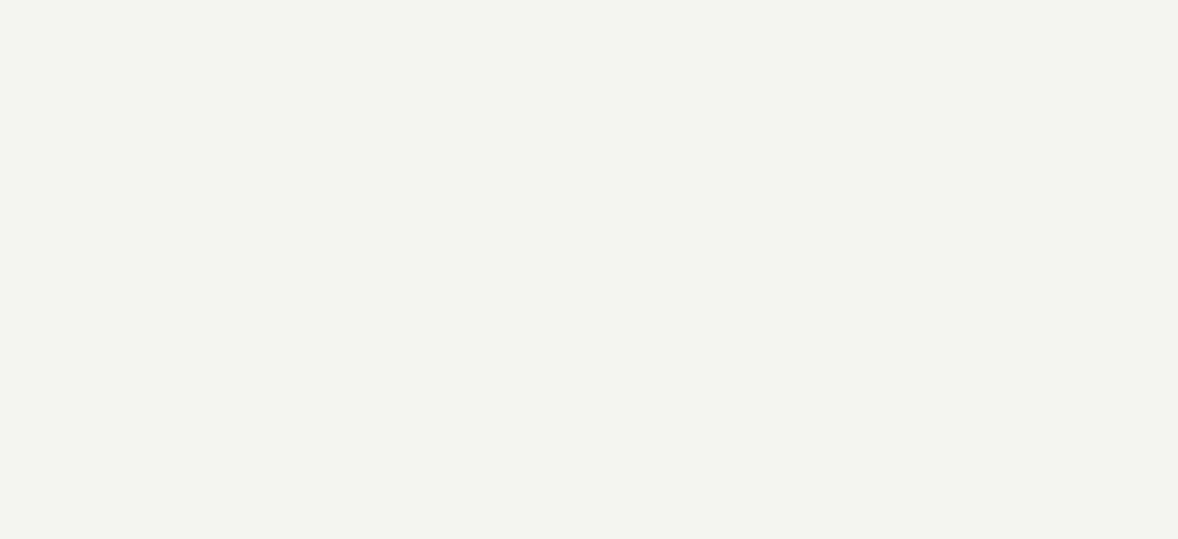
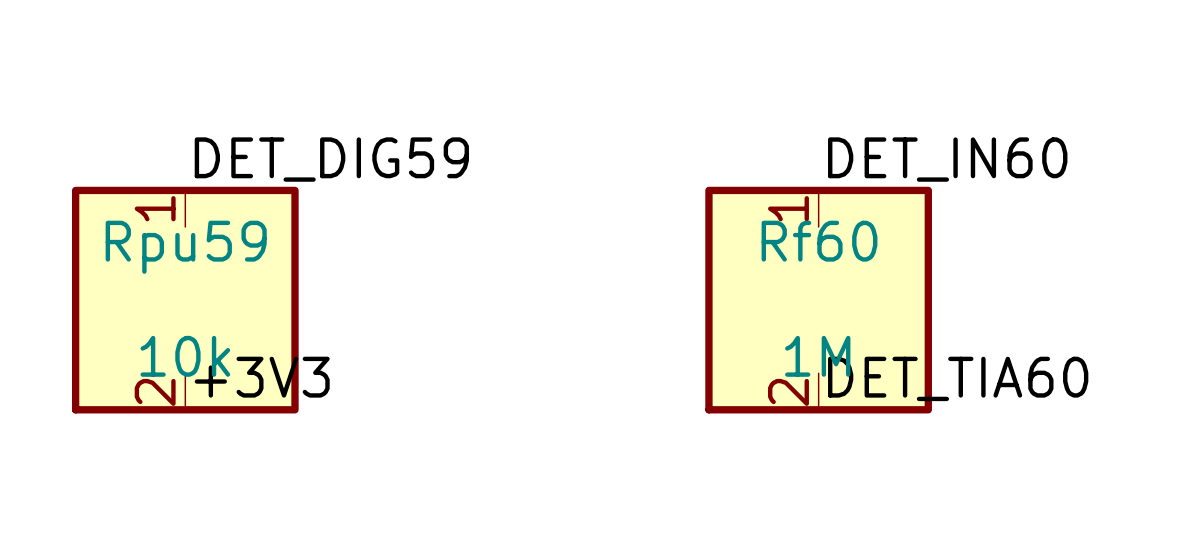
label: none -> DET_DIG59 (331, 159)
label: none -> DET_IN60 (947, 159)
Rpu59: none -> 10k (185, 300)
Rf60: none -> 1M (818, 300)
label: none -> +3V3 (262, 377)
label: none -> DET_TIA60 (958, 378)

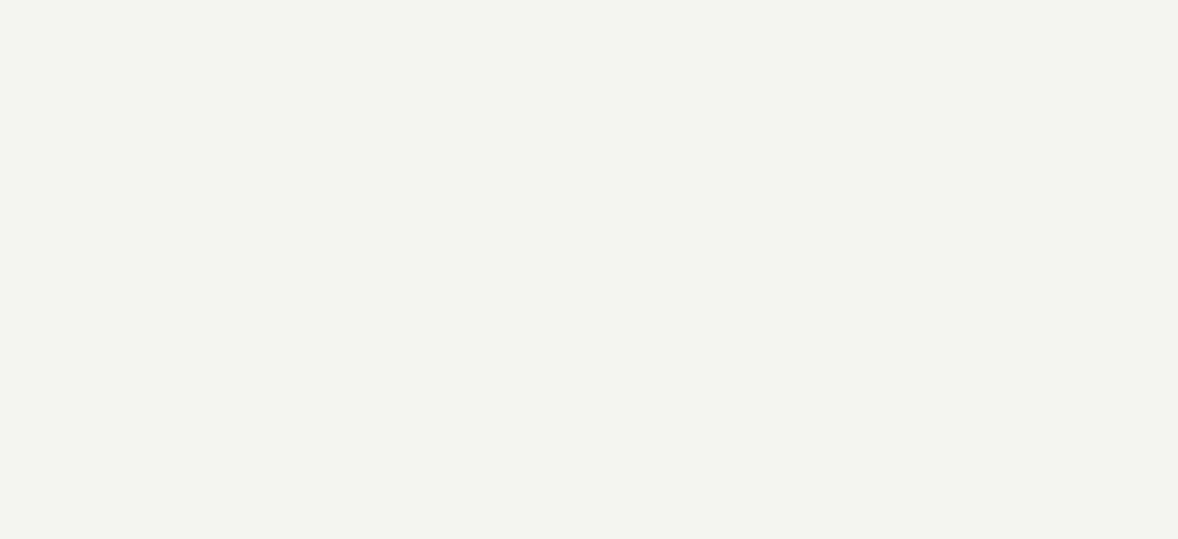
label: DET_DIG59 (331, 159) -> none
label: DET_IN60 (947, 159) -> none
Rpu59: 10k (185, 300) -> none
Rf60: 1M (818, 300) -> none
label: +3V3 (262, 377) -> none
label: DET_TIA60 (958, 378) -> none

